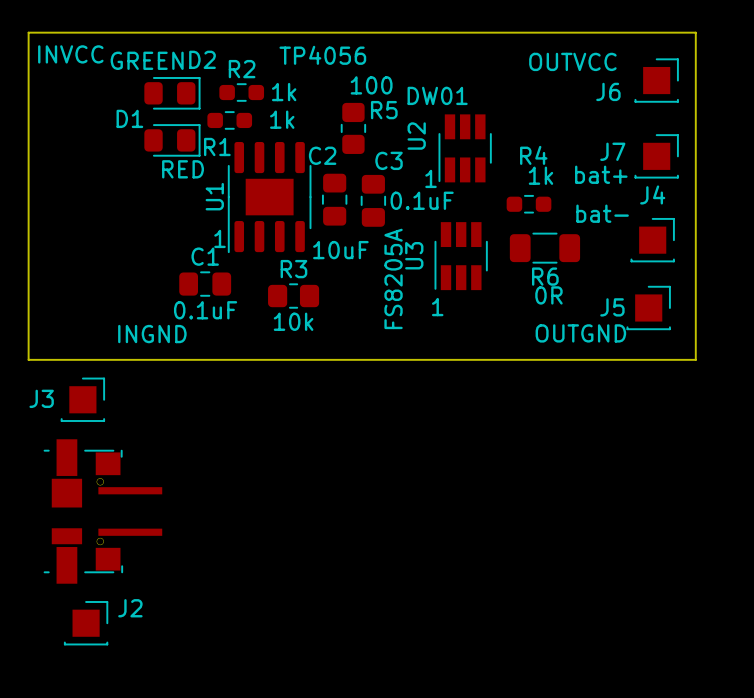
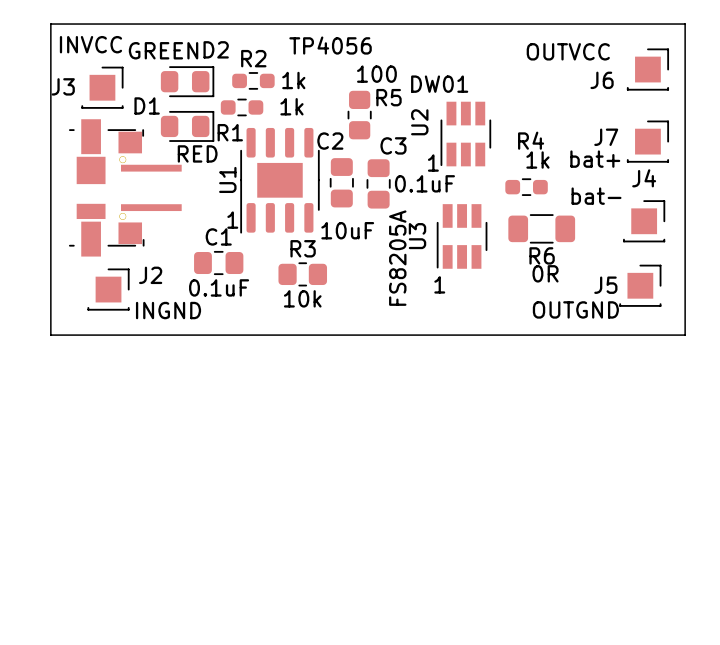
J3 position: (82, 399) -> (102, 87)
part position: (102, 511) -> (125, 187)
J2 position: (86, 623) -> (108, 289)

